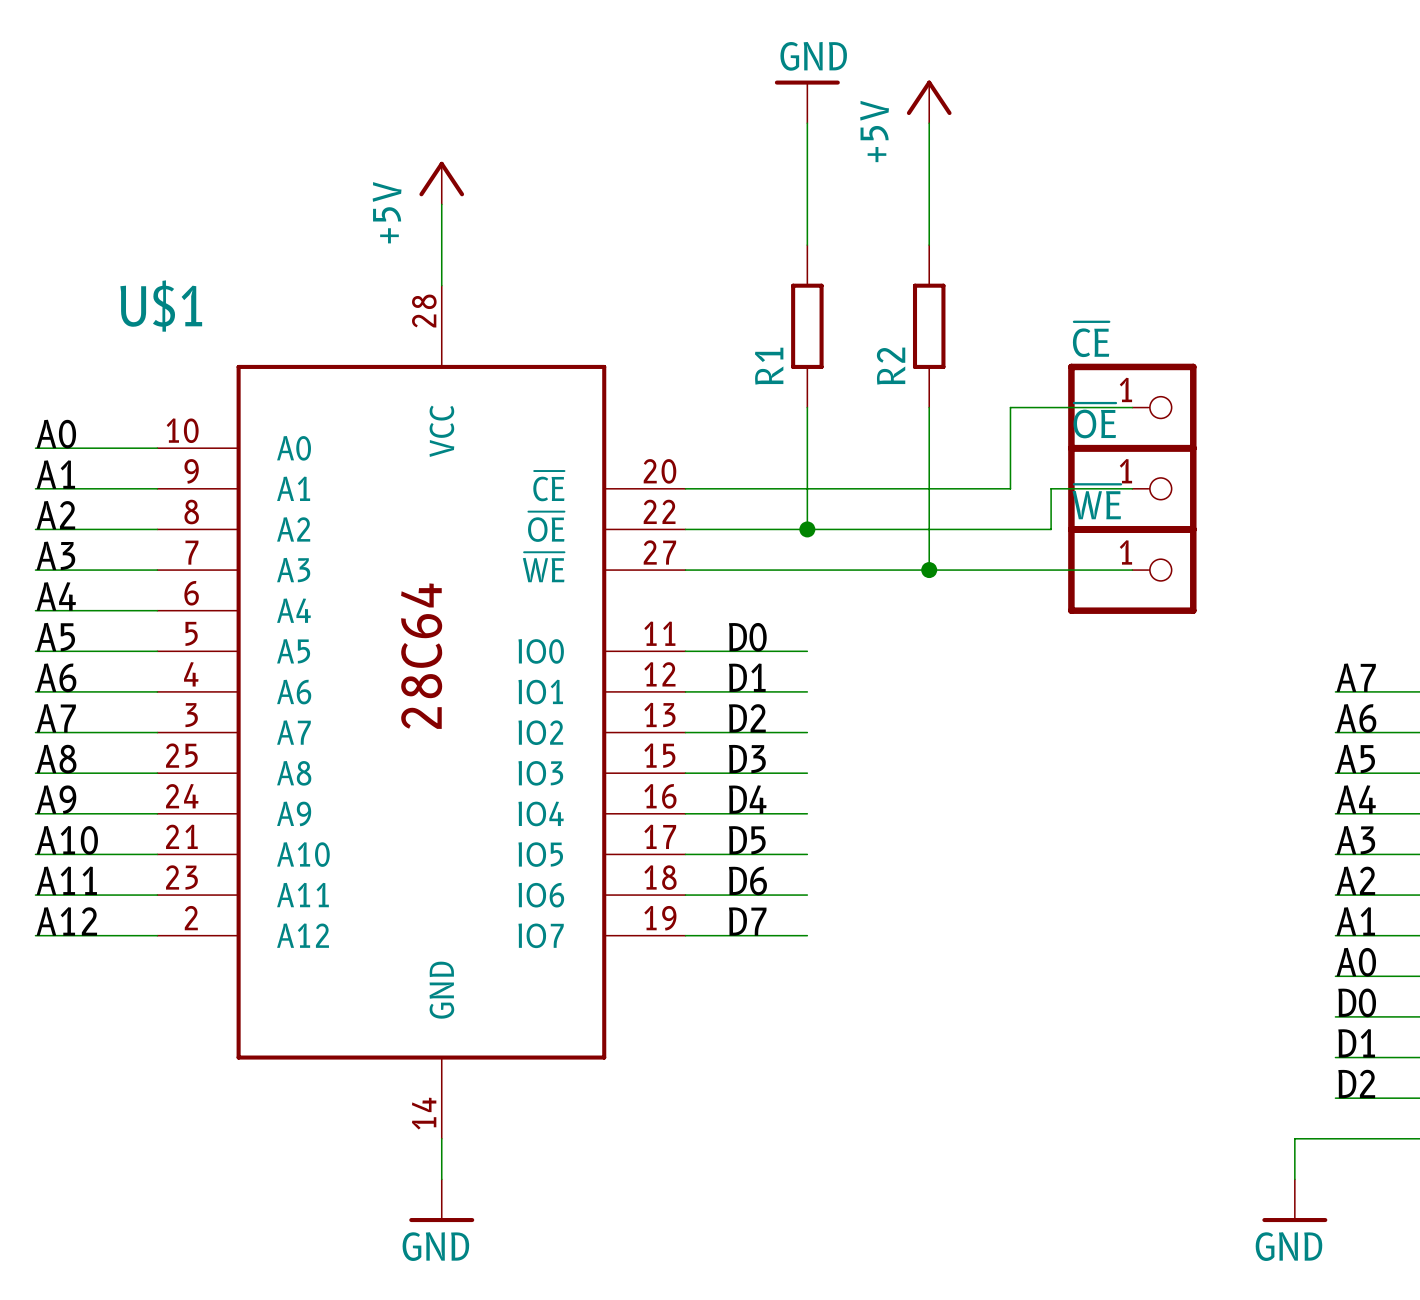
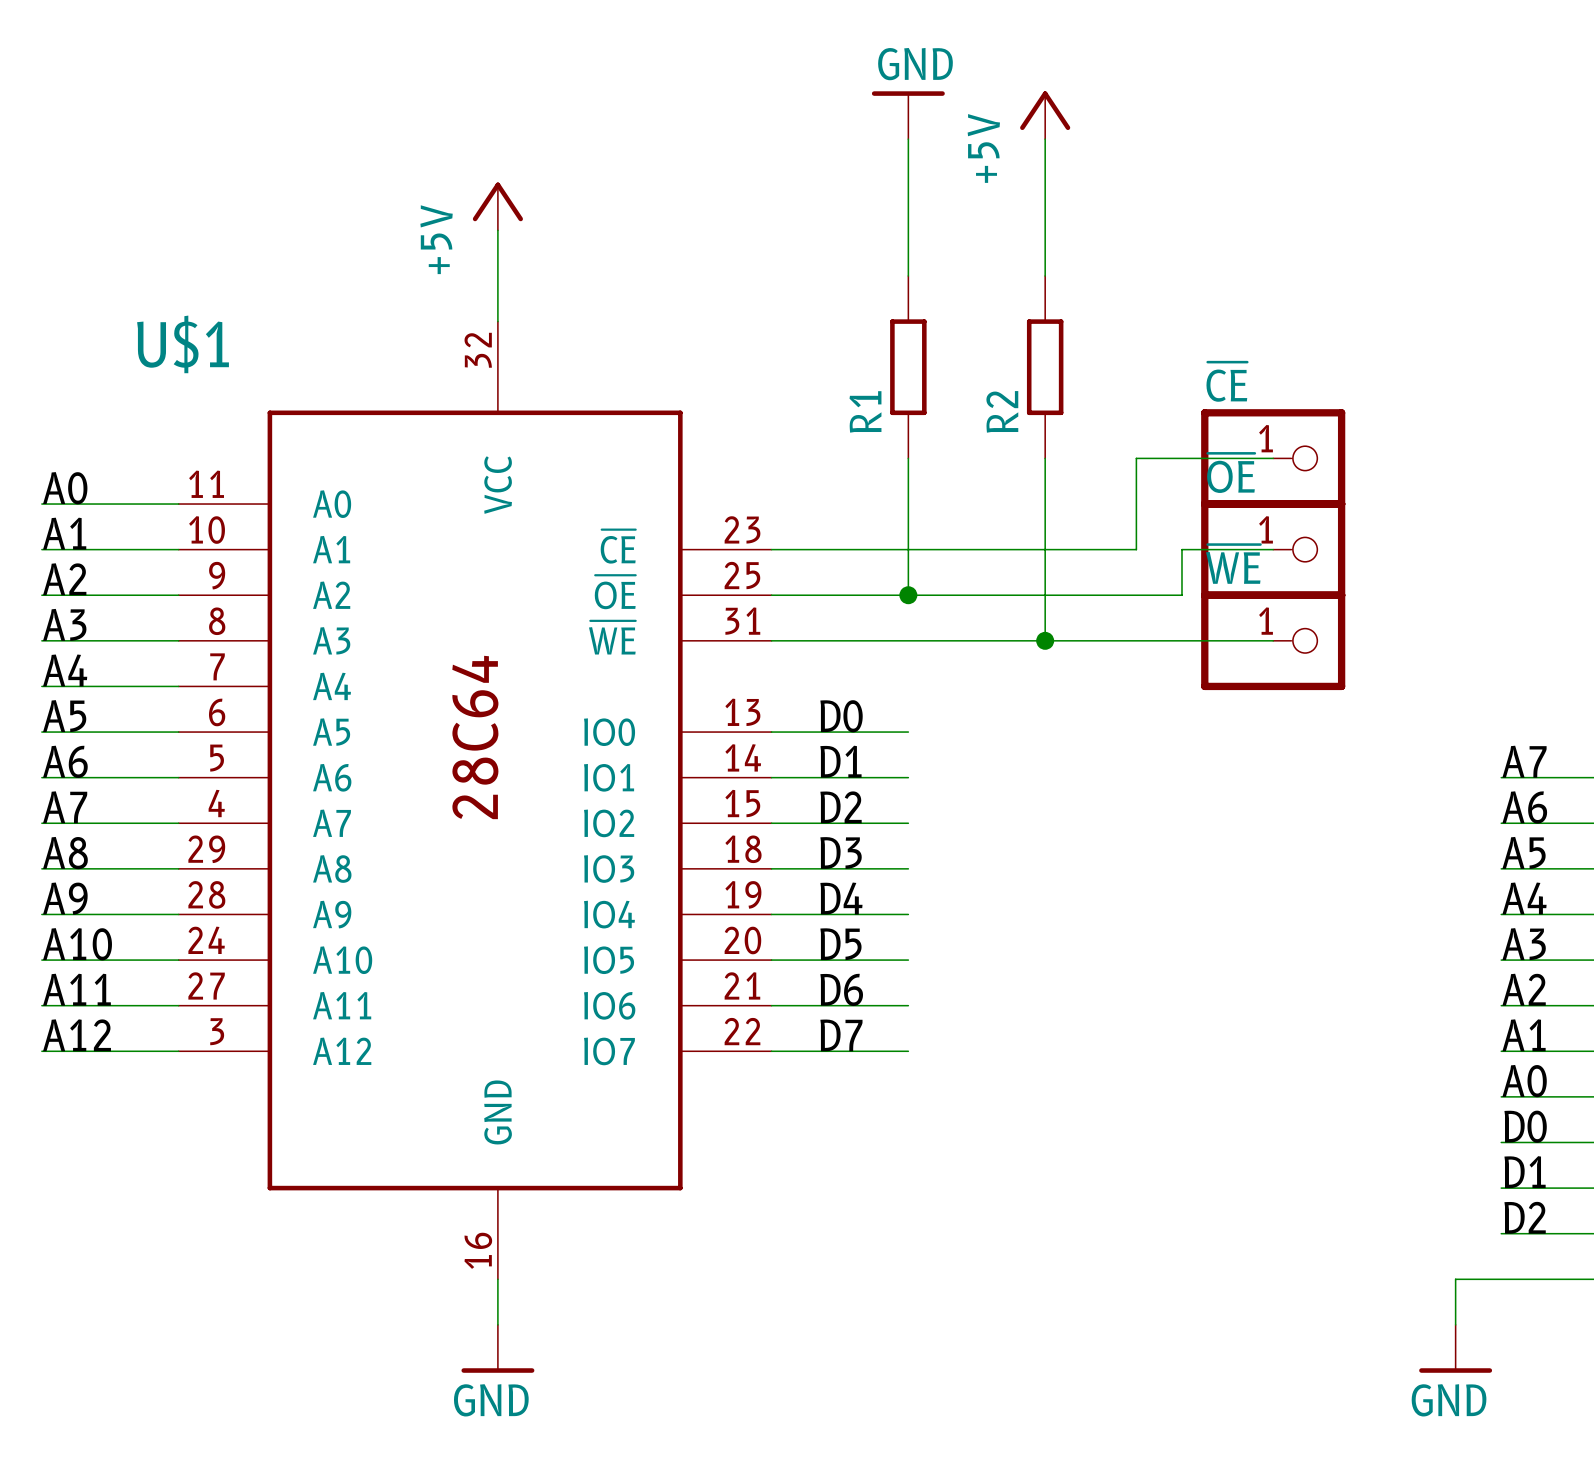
U$1 symbol: [157, 285, 686, 1139] -> [178, 321, 772, 1280]

